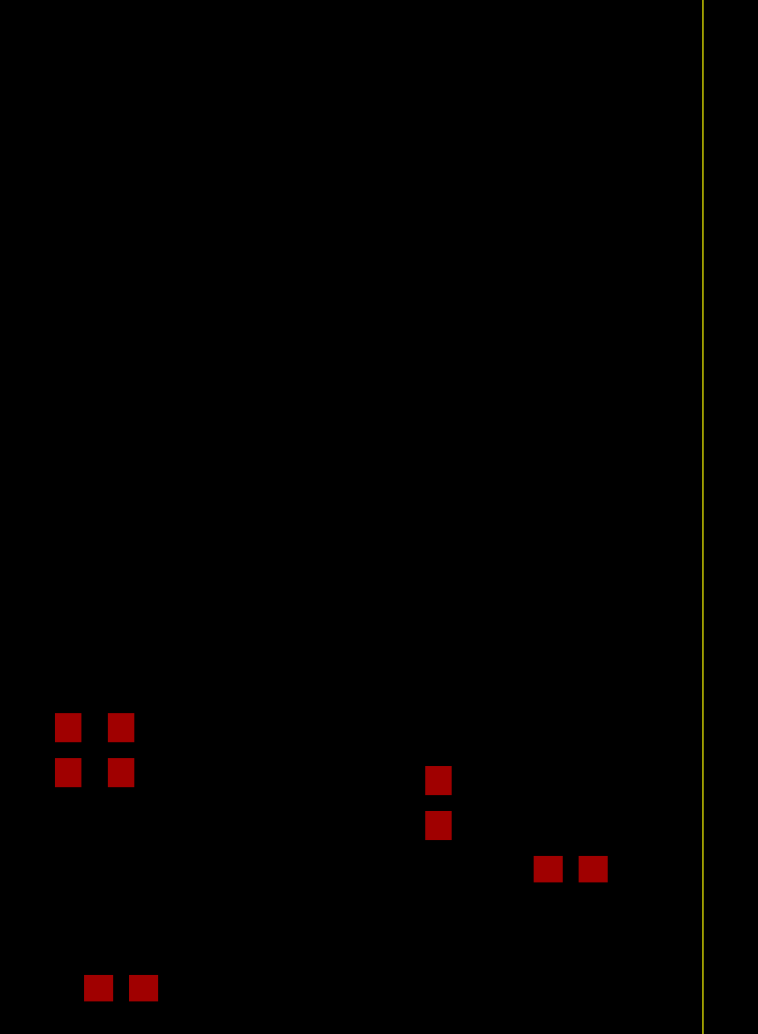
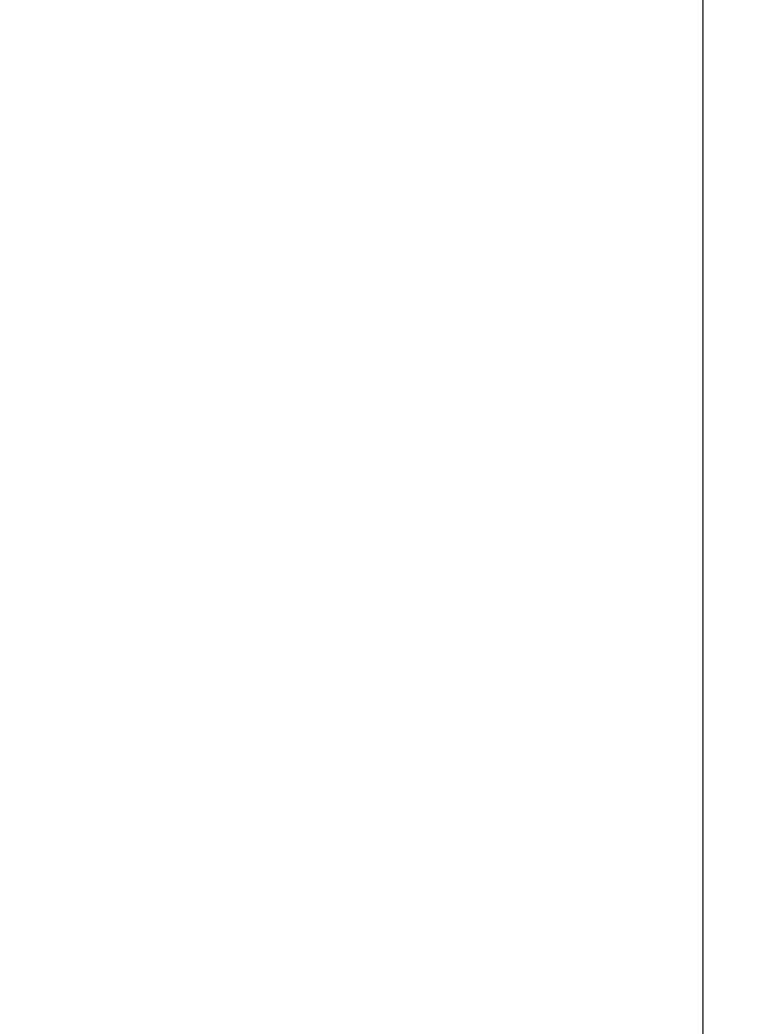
part: (68, 750) -> none
part: (121, 750) -> none
part: (438, 803) -> none
part: (570, 869) -> none
part: (121, 988) -> none

